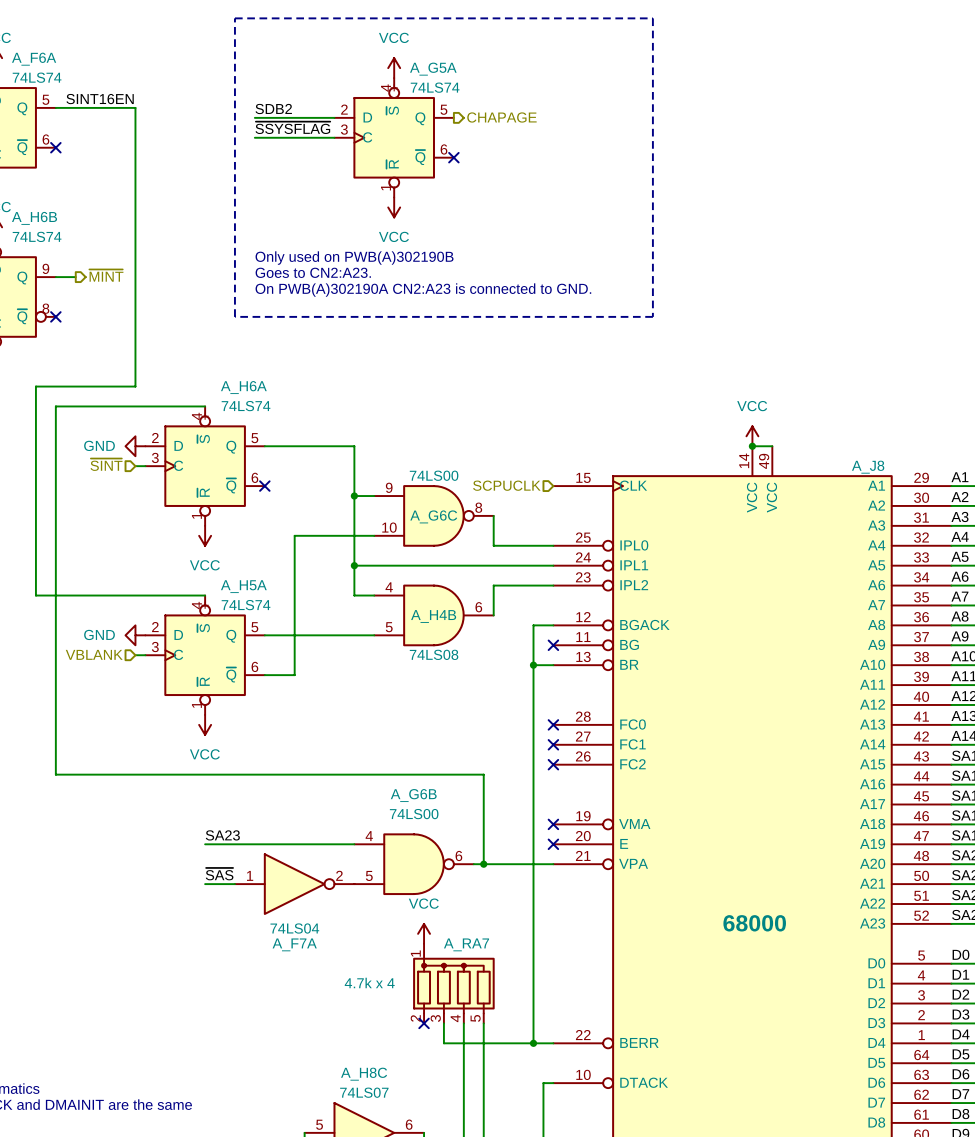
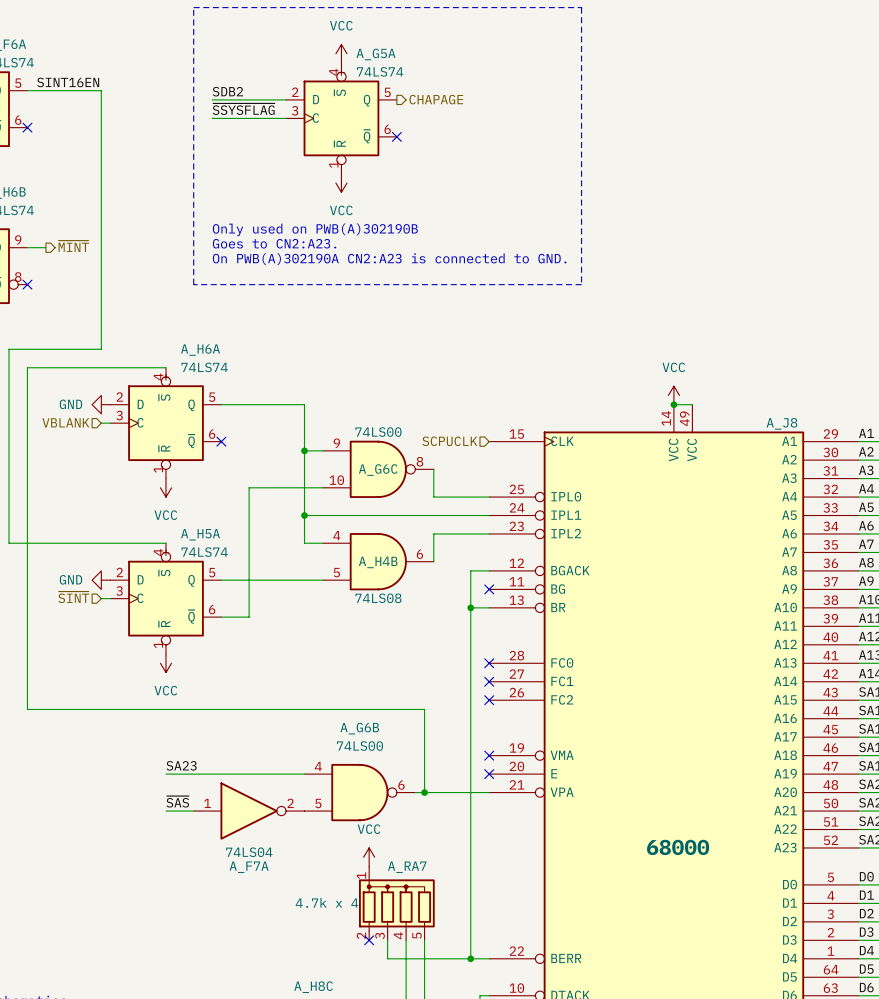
hierarchical label: ~{SINT} (106, 464) -> VBLANK (65, 422)
hierarchical label: VBLANK (94, 654) -> ~{SINT} (73, 597)

